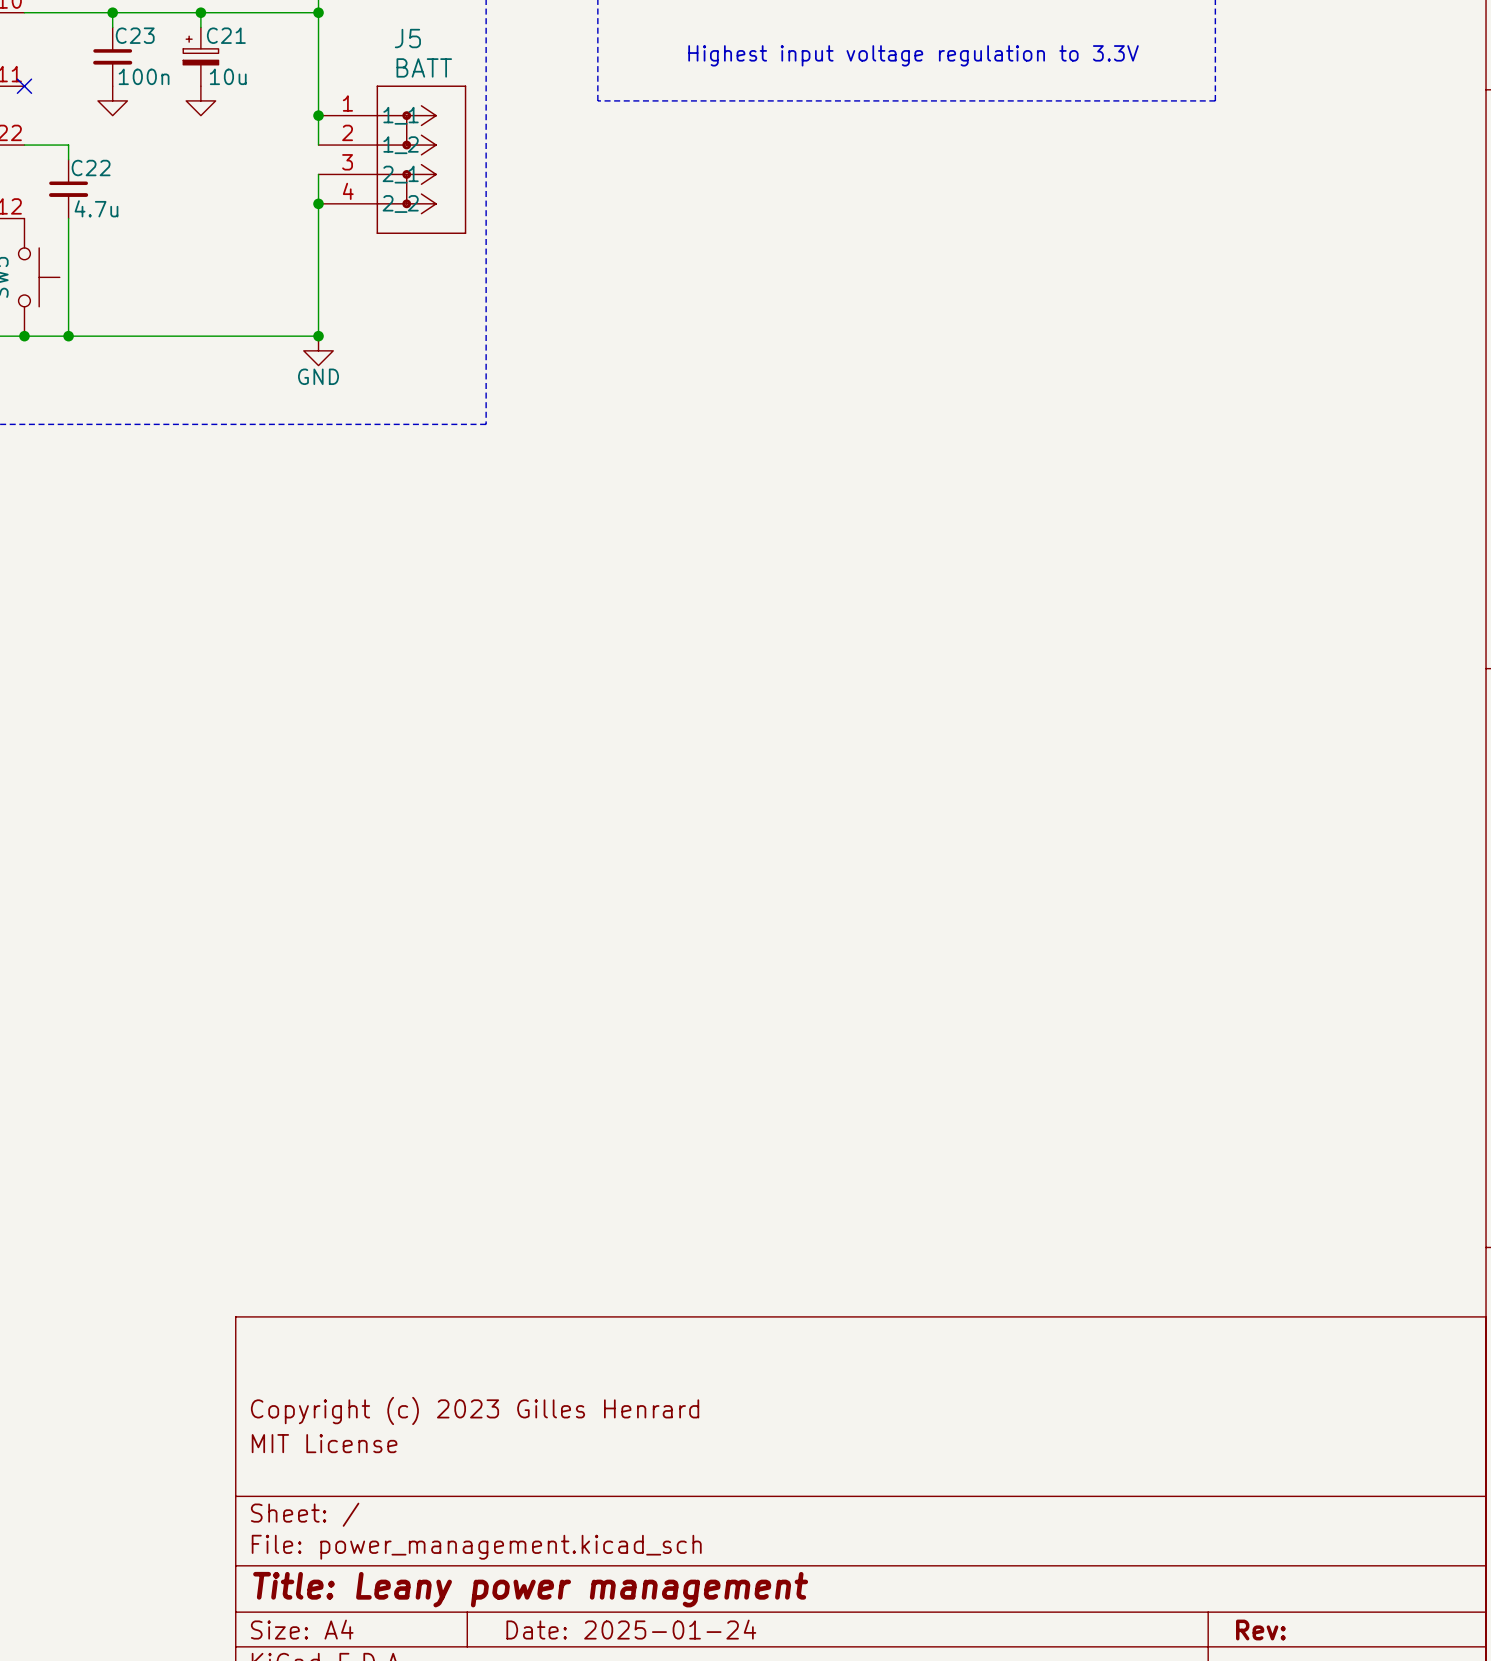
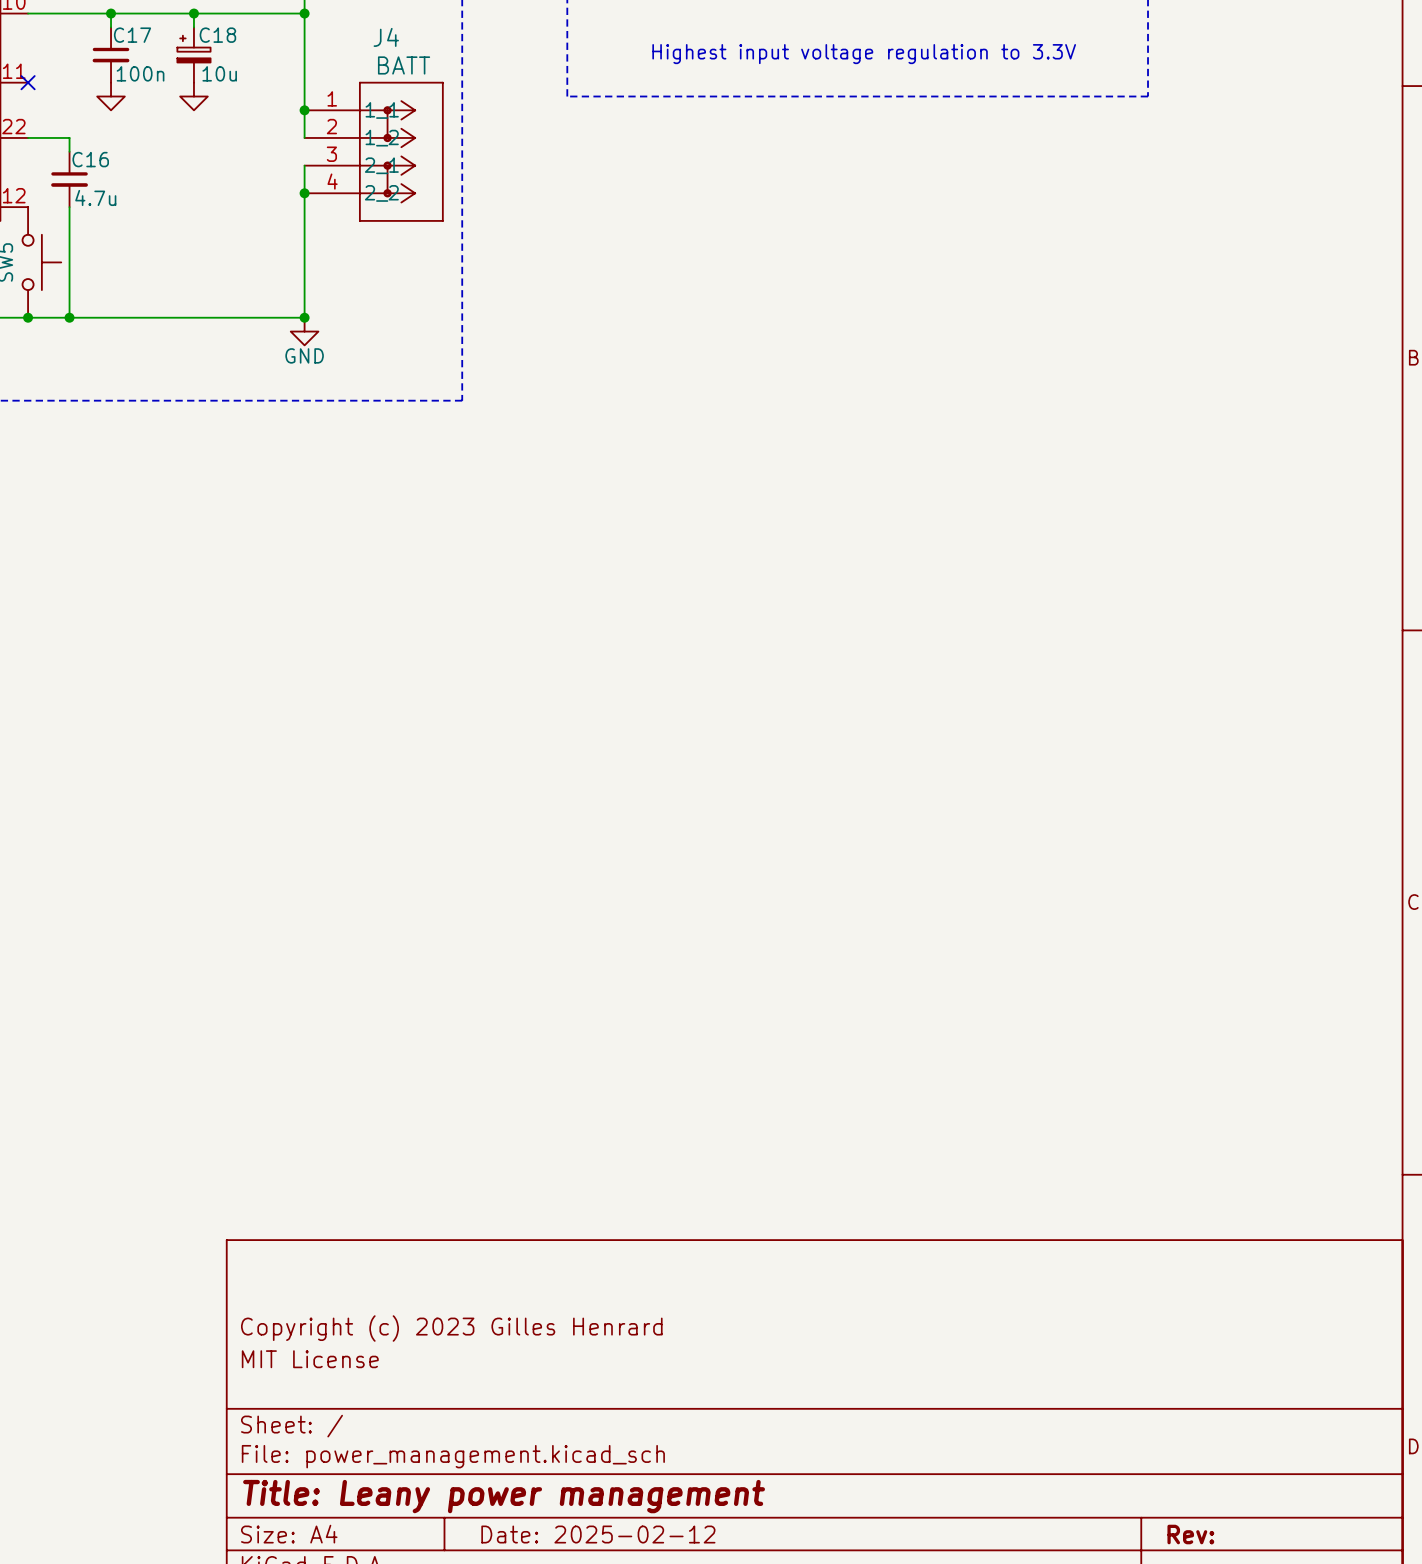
C23 name: C23 (135, 35) -> C17 (132, 35)
C21 name: C21 (226, 35) -> C18 (217, 35)
J5 name: J5 (407, 38) -> J4 (386, 37)
C22 name: C22 (91, 168) -> C16 (90, 159)
title block: Date: 2025-01-24 (631, 1629) -> Date: 2025-02-12 (598, 1534)

